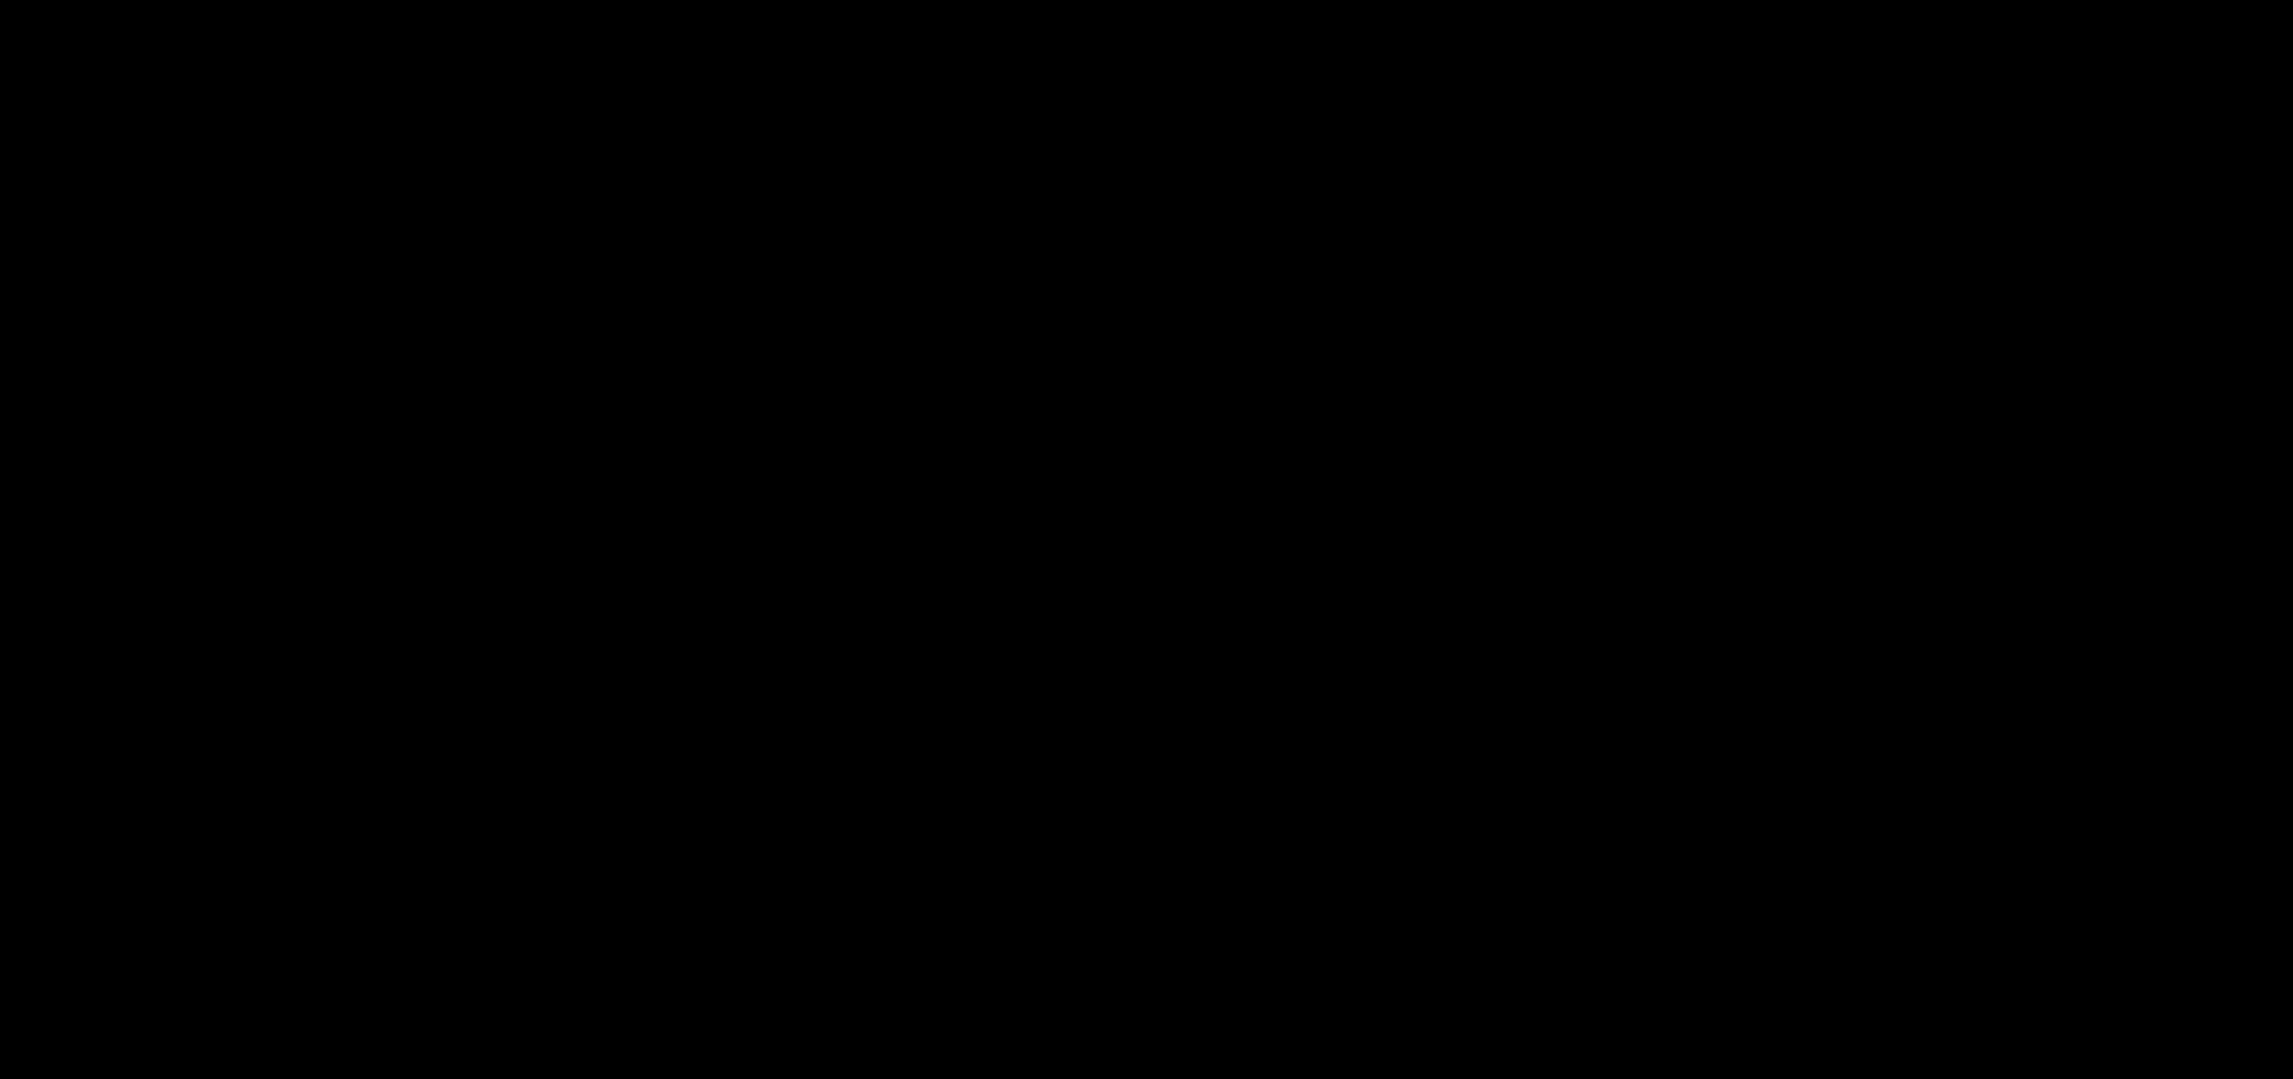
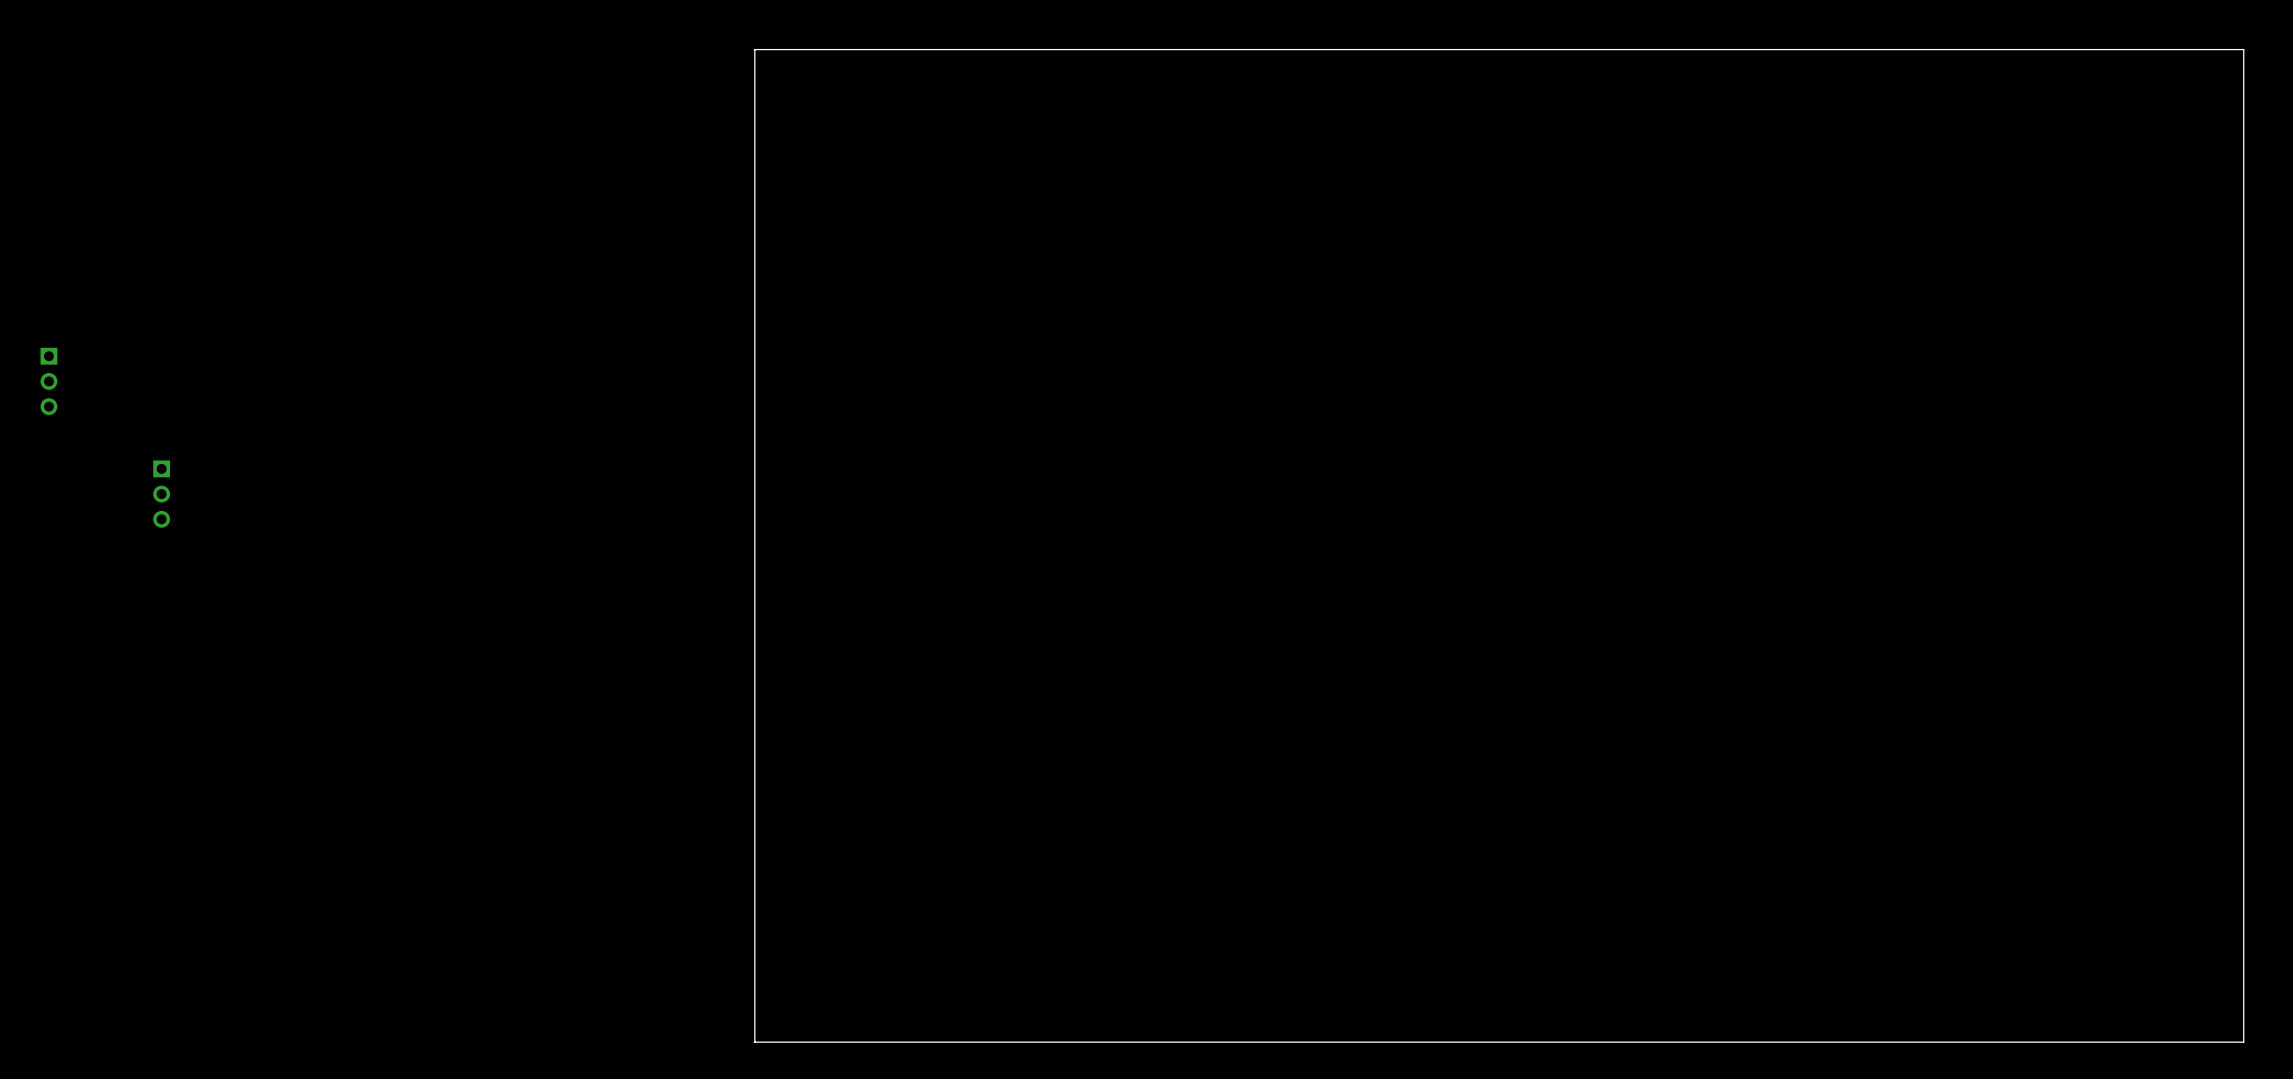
board edge: none -> (2243, 49) (2243, 1042) (754, 1042) (754, 49) (2243, 49)
part: none -> (48, 381)
part: none -> (161, 494)

